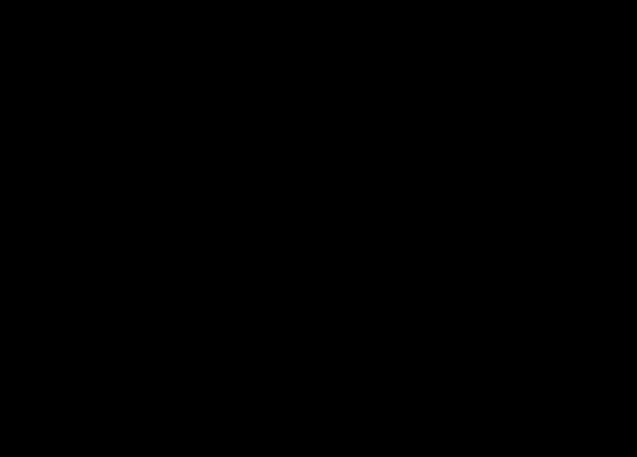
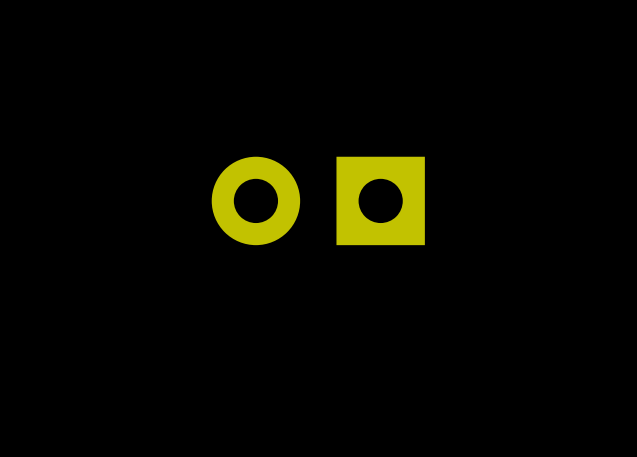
part: none -> (318, 200)

